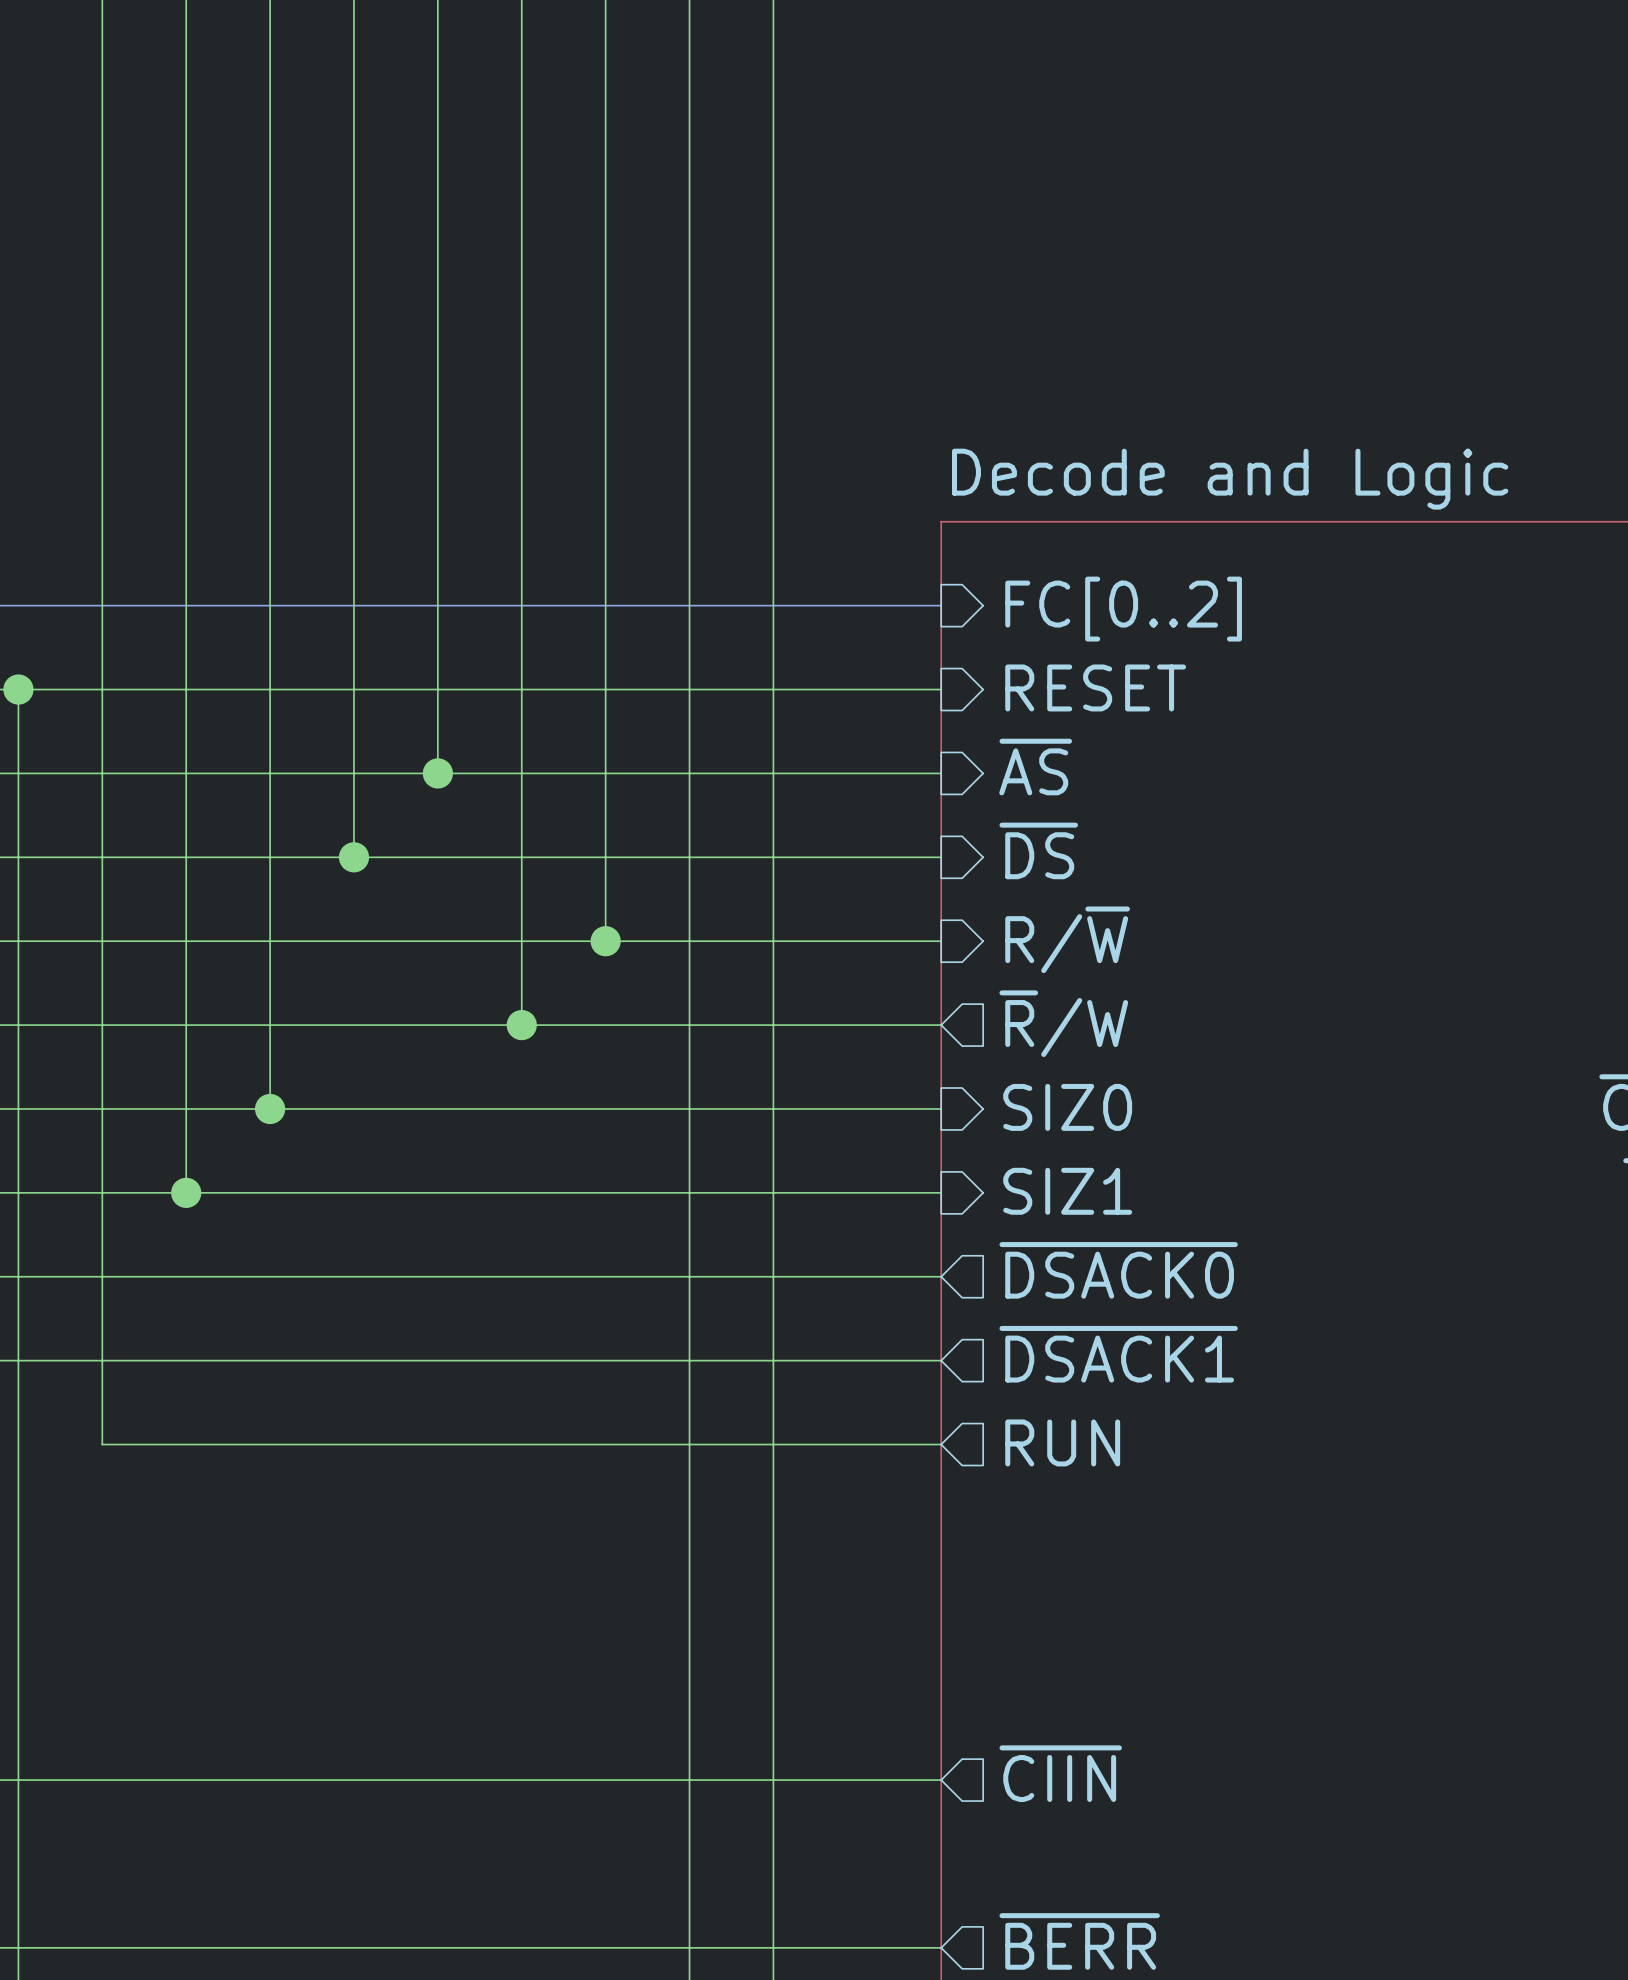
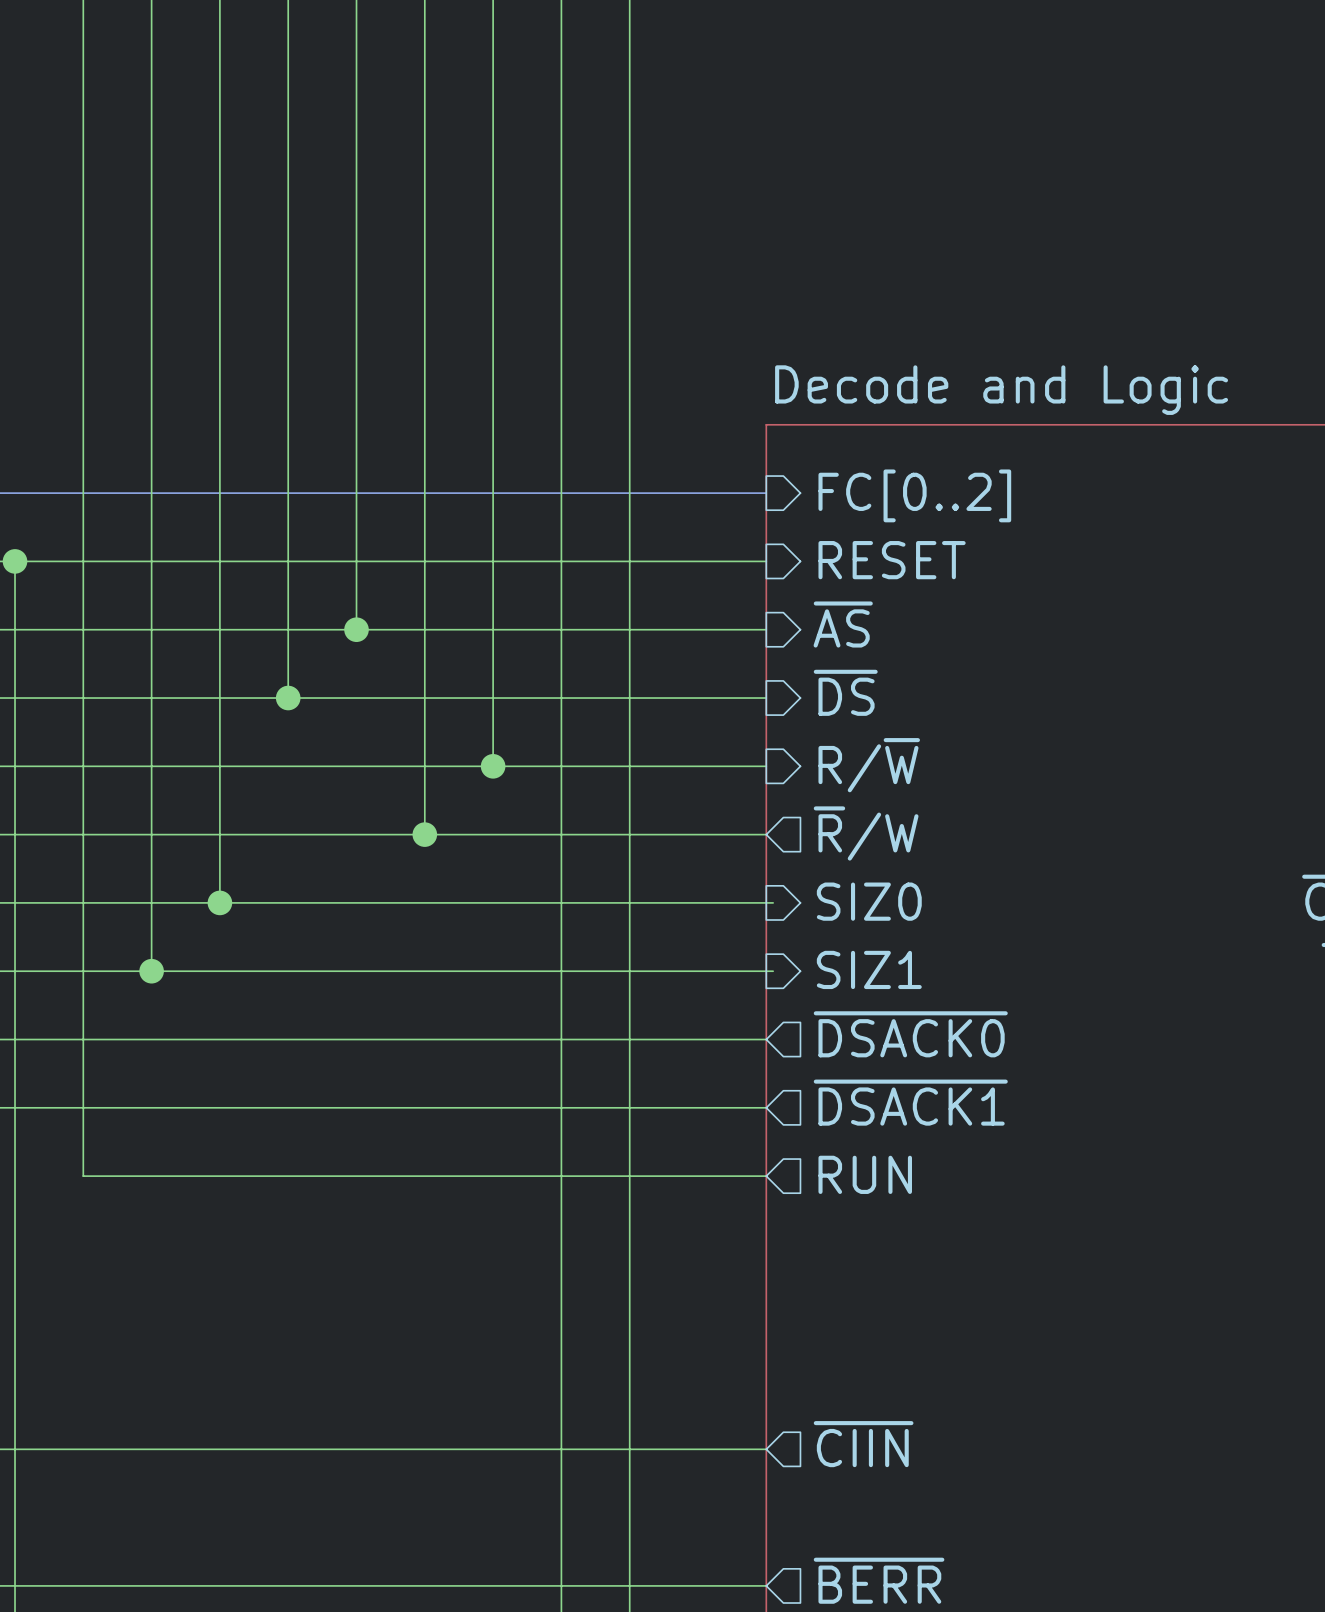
wire: none -> (766, 902) (773, 902)
wire: none -> (766, 971) (773, 971)

